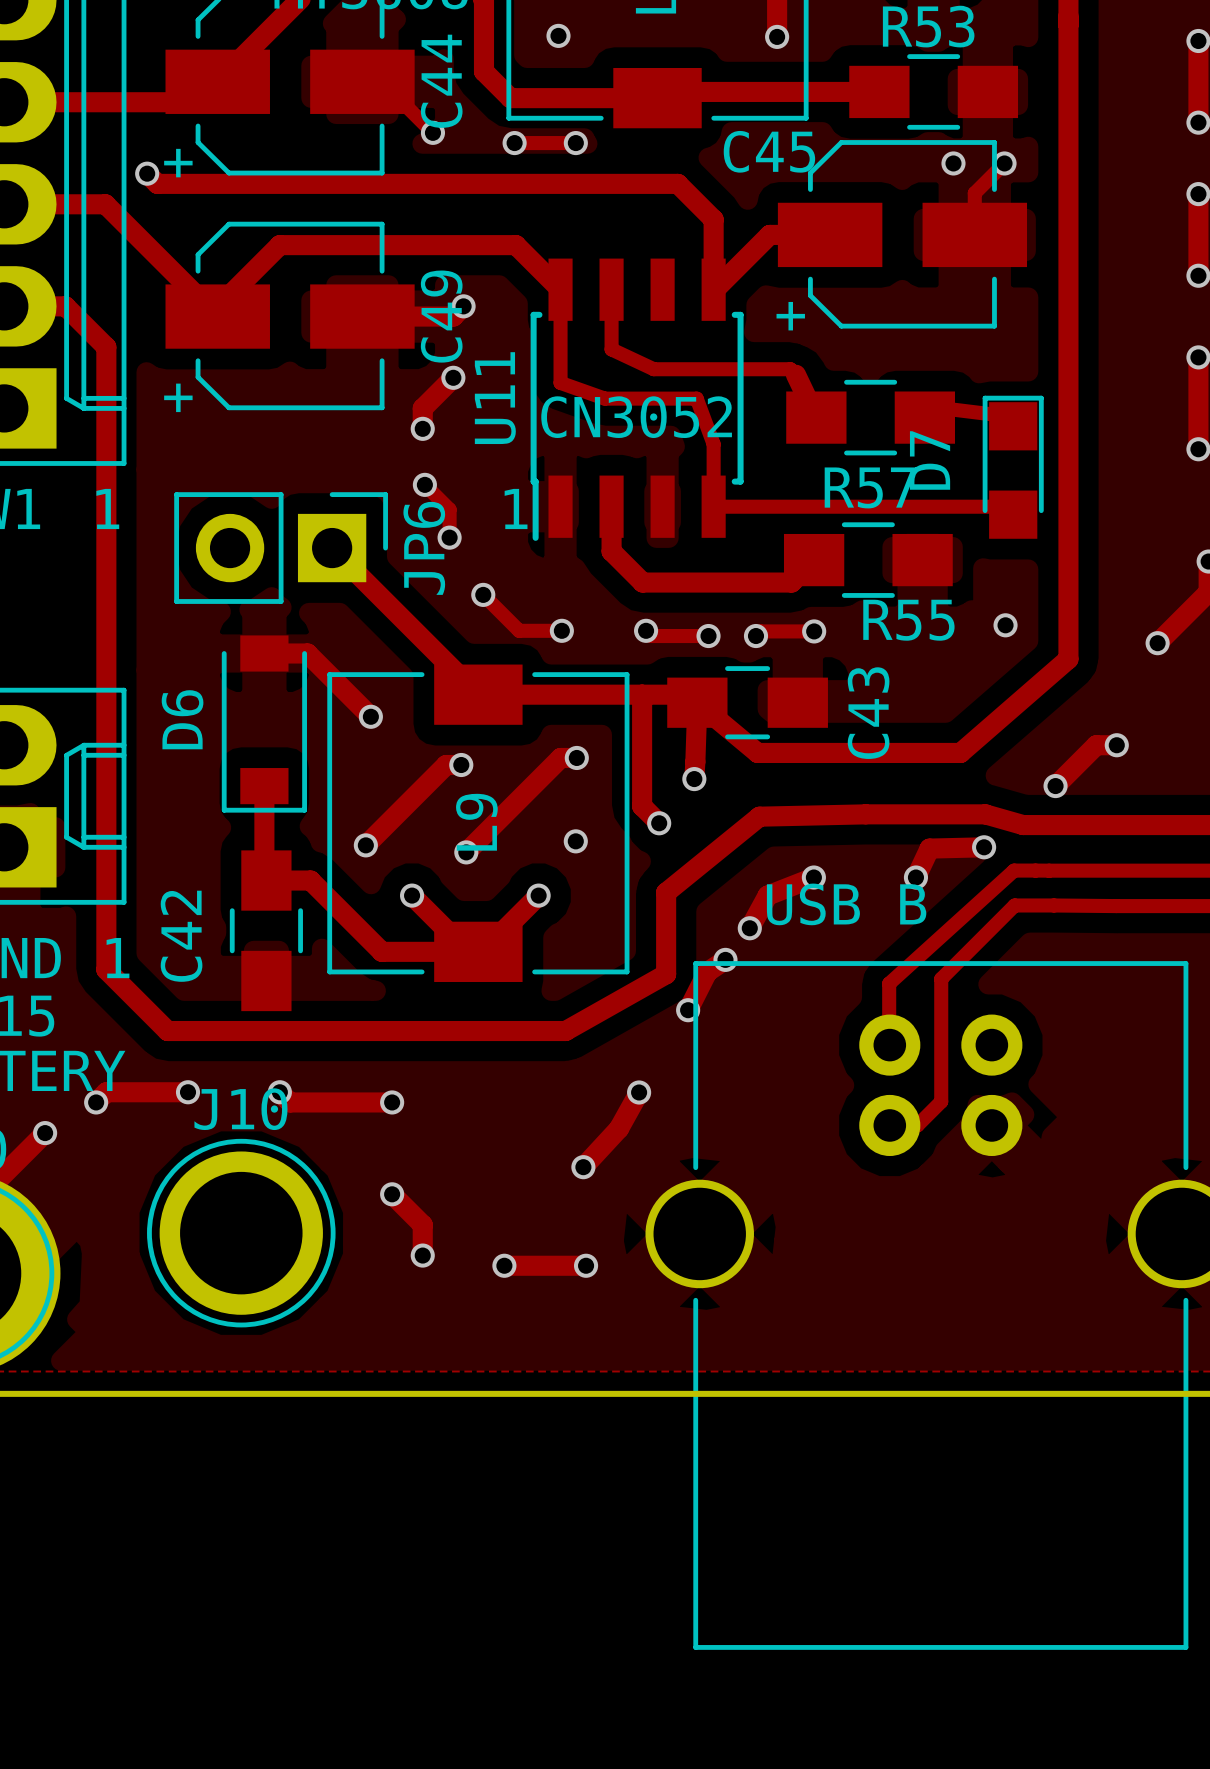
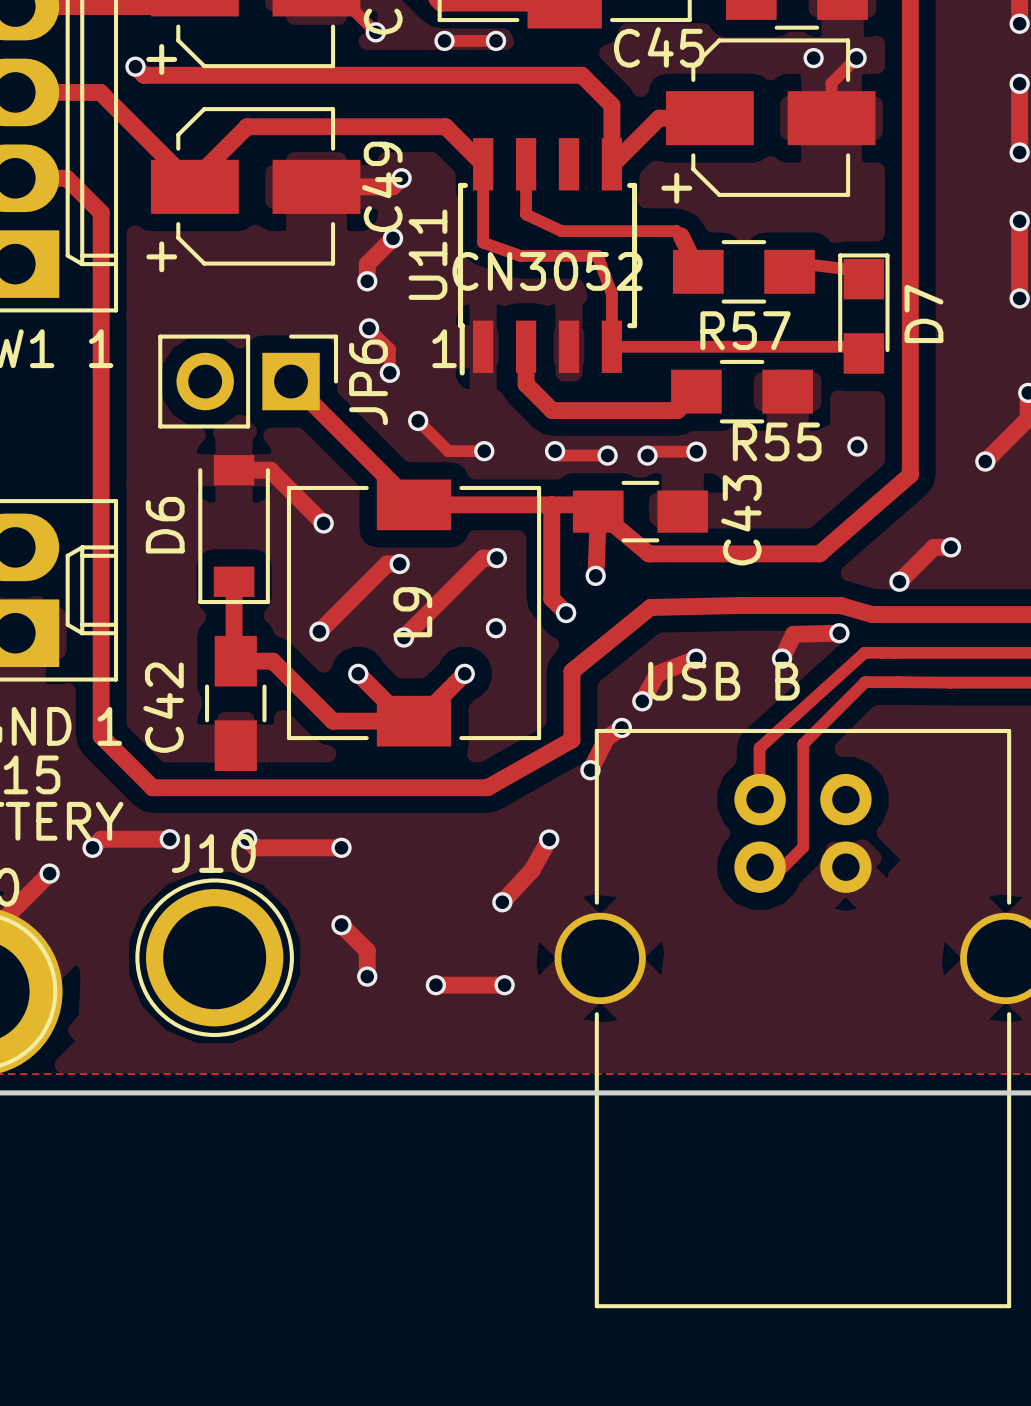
D7 name position: D7 (930, 460) -> D7 (923, 314)

